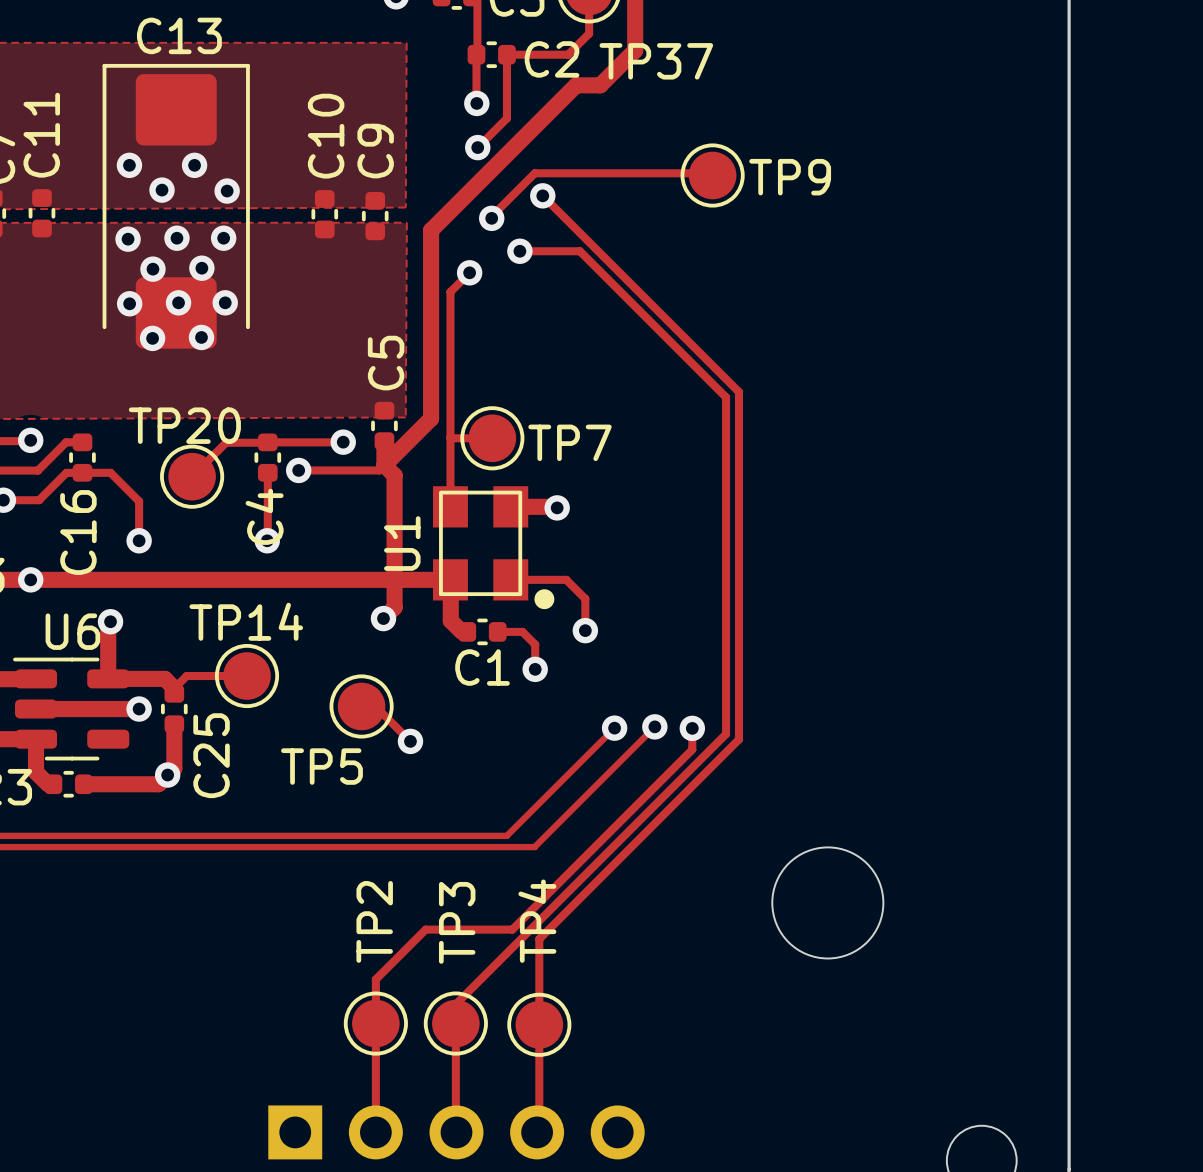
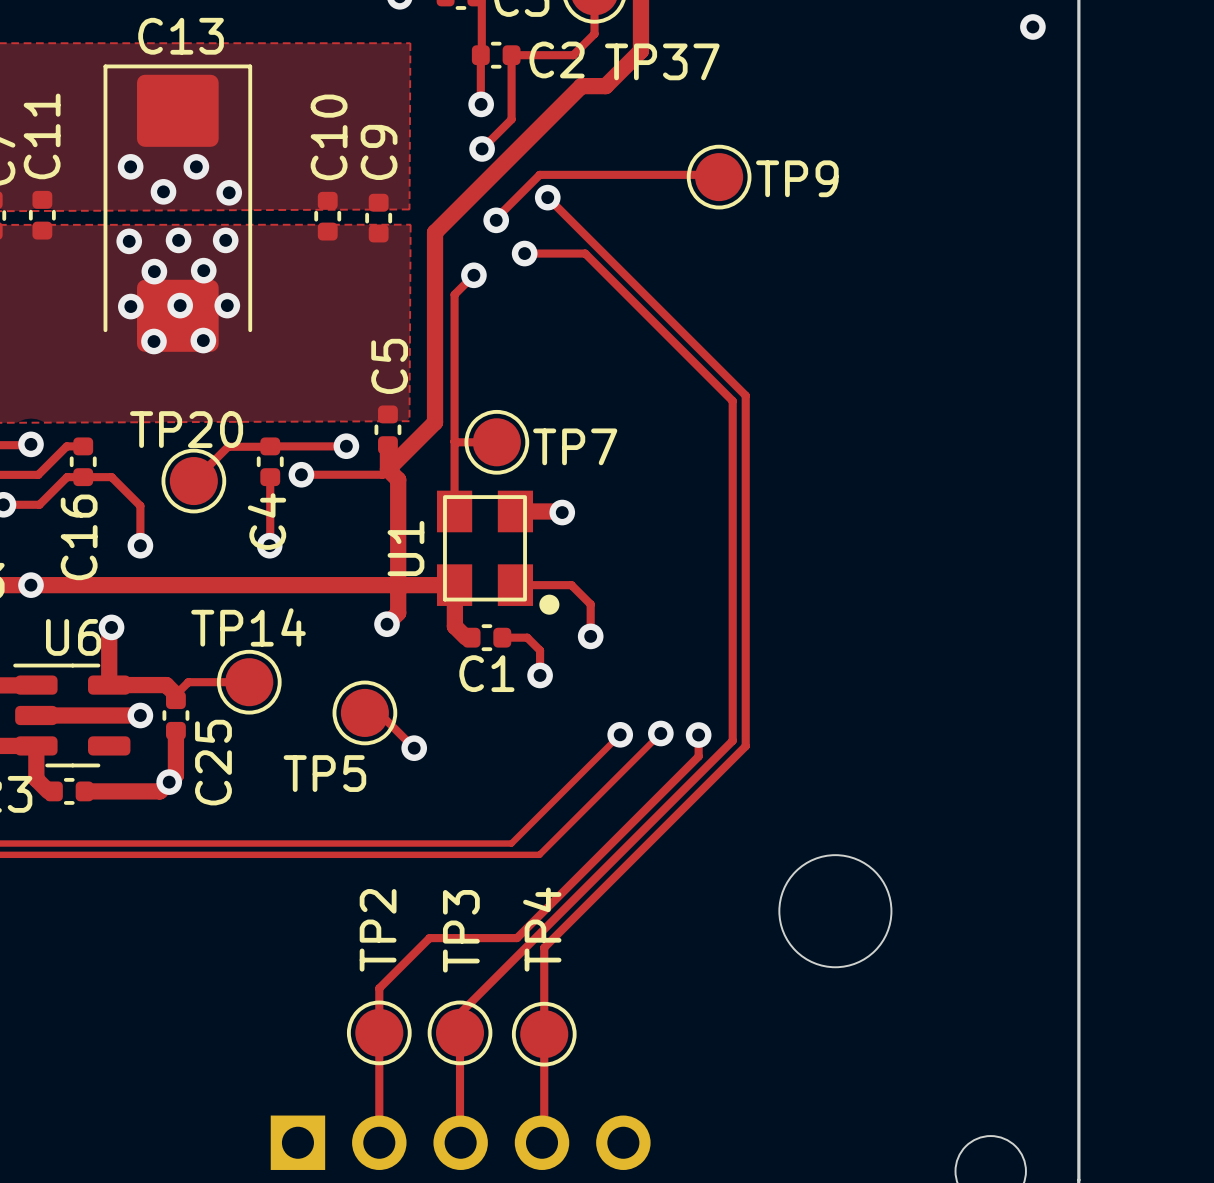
via: none -> (1032, 26)

